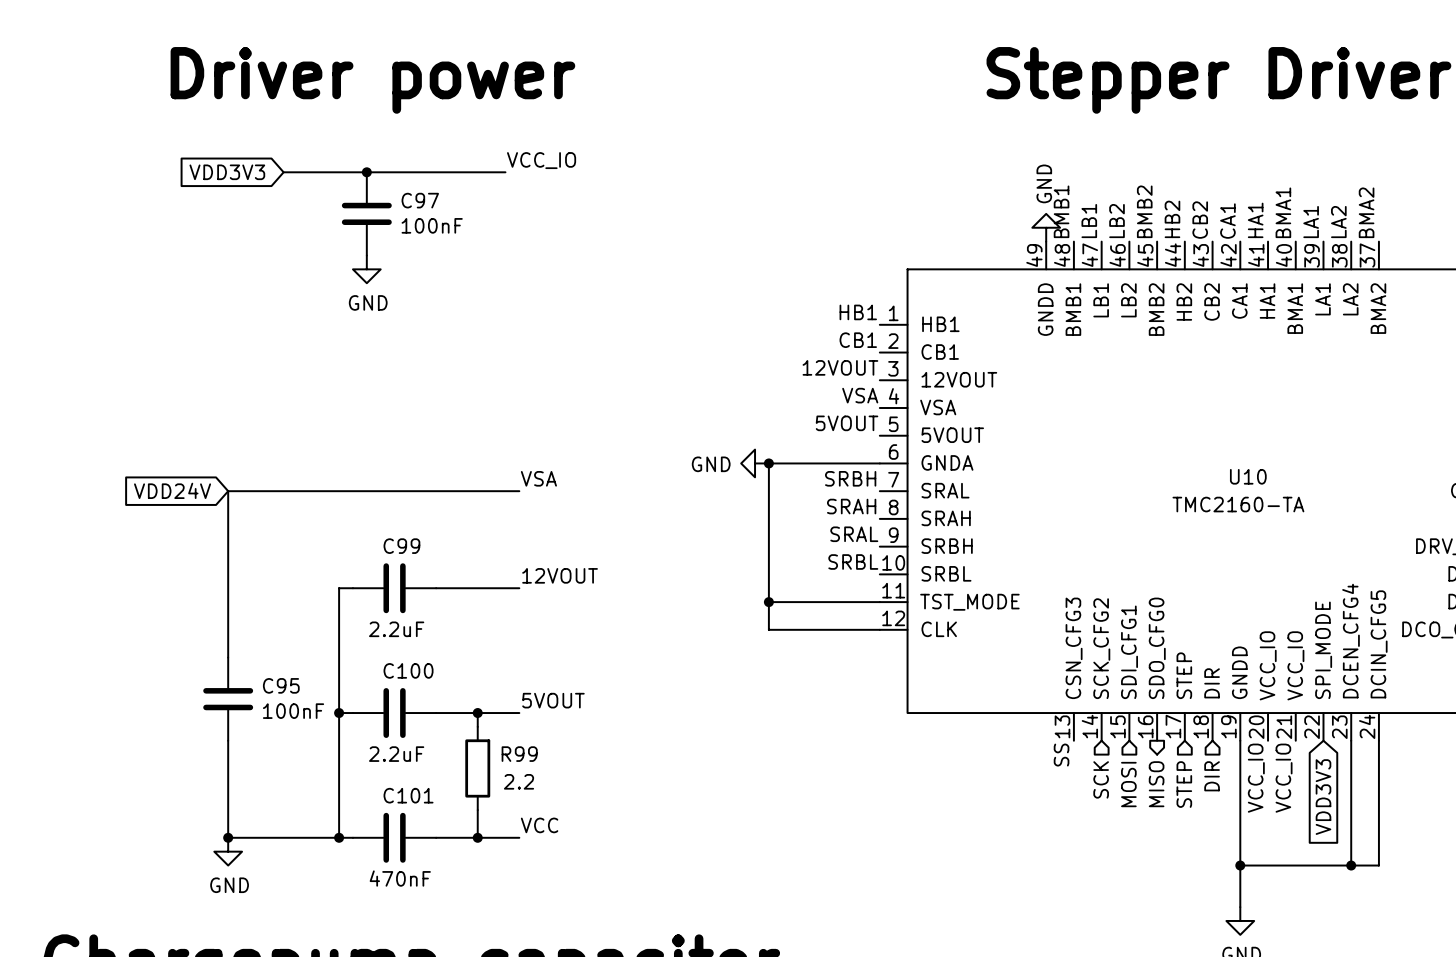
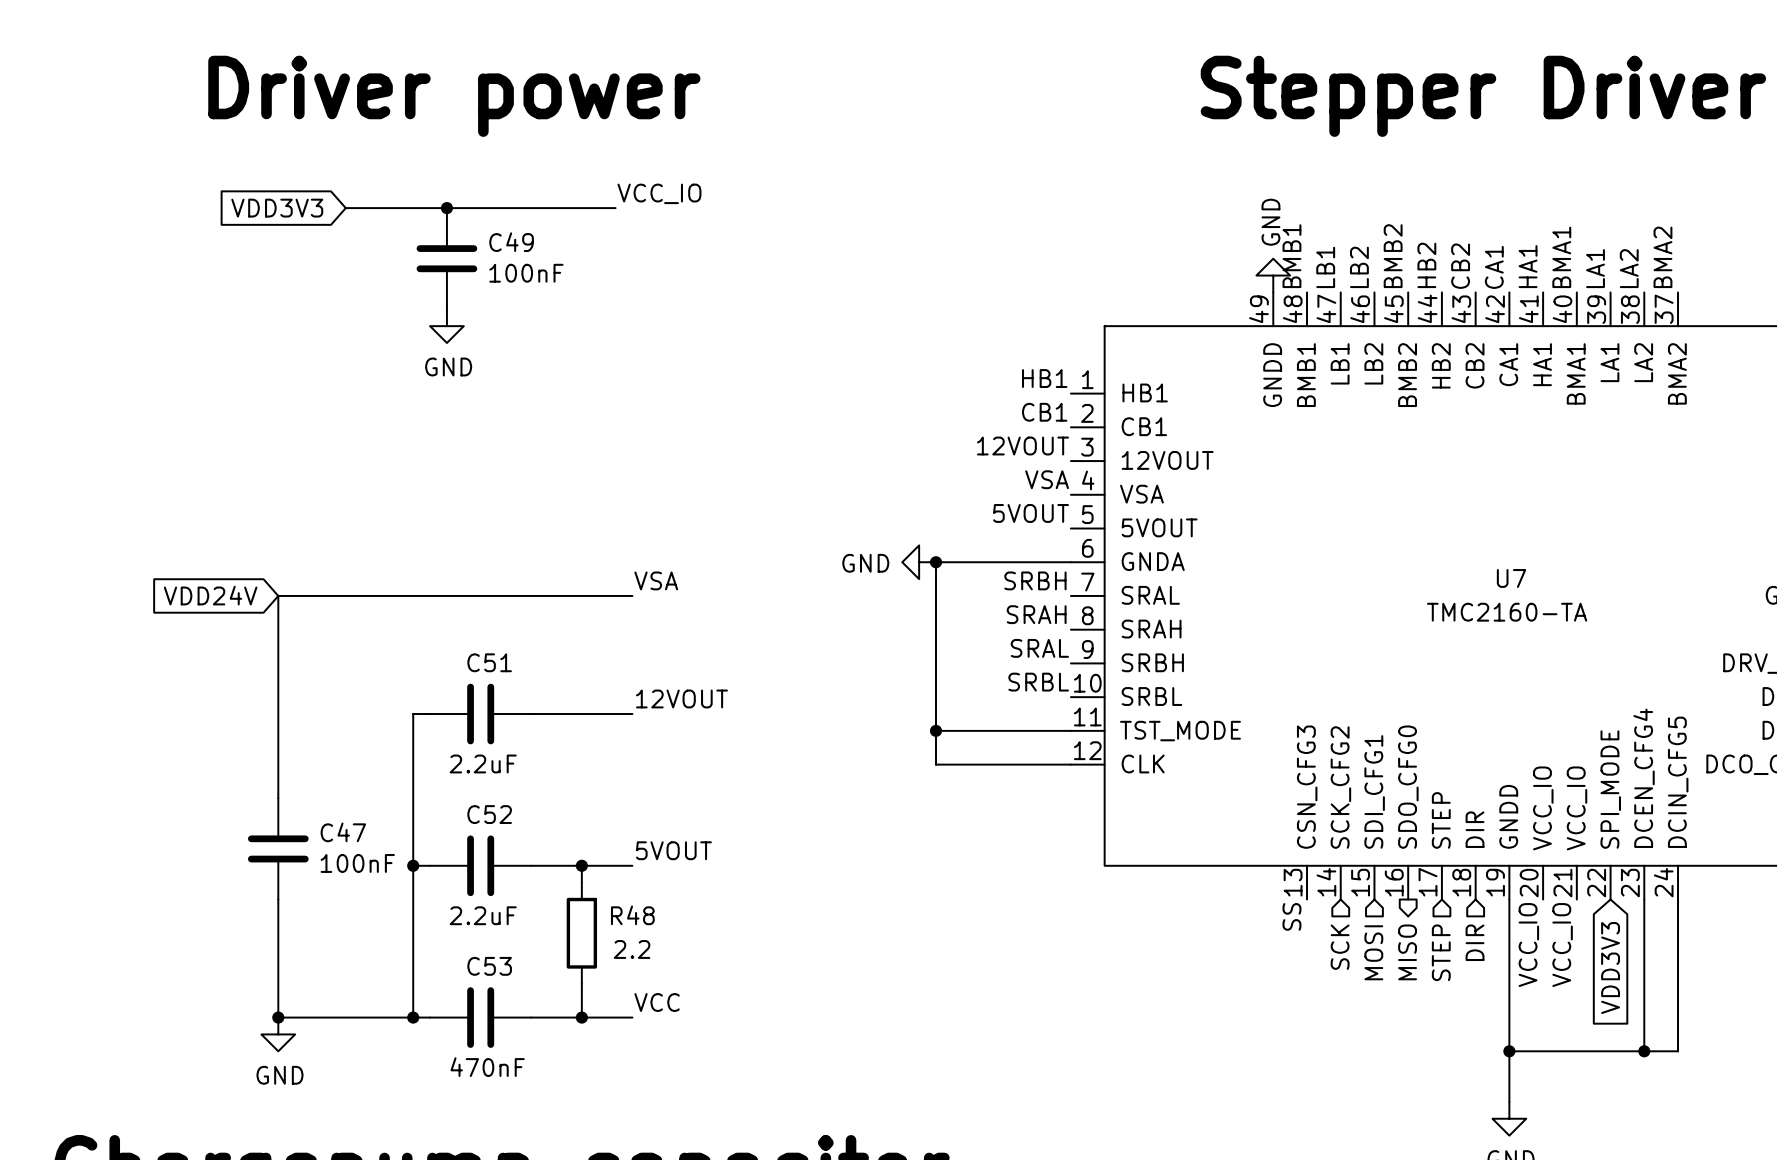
C97 name: C97 (420, 200) -> C49 (511, 242)
U10 name: U10 (1248, 476) -> U7 (1511, 578)
C99 name: C99 (401, 546) -> C51 (489, 662)
C100 name: C100 (408, 670) -> C52 (489, 814)
C95 name: C95 (281, 685) -> C47 (343, 832)
R99 name: R99 (519, 754) -> R48 (632, 915)
C101 name: C101 (408, 795) -> C53 (489, 966)

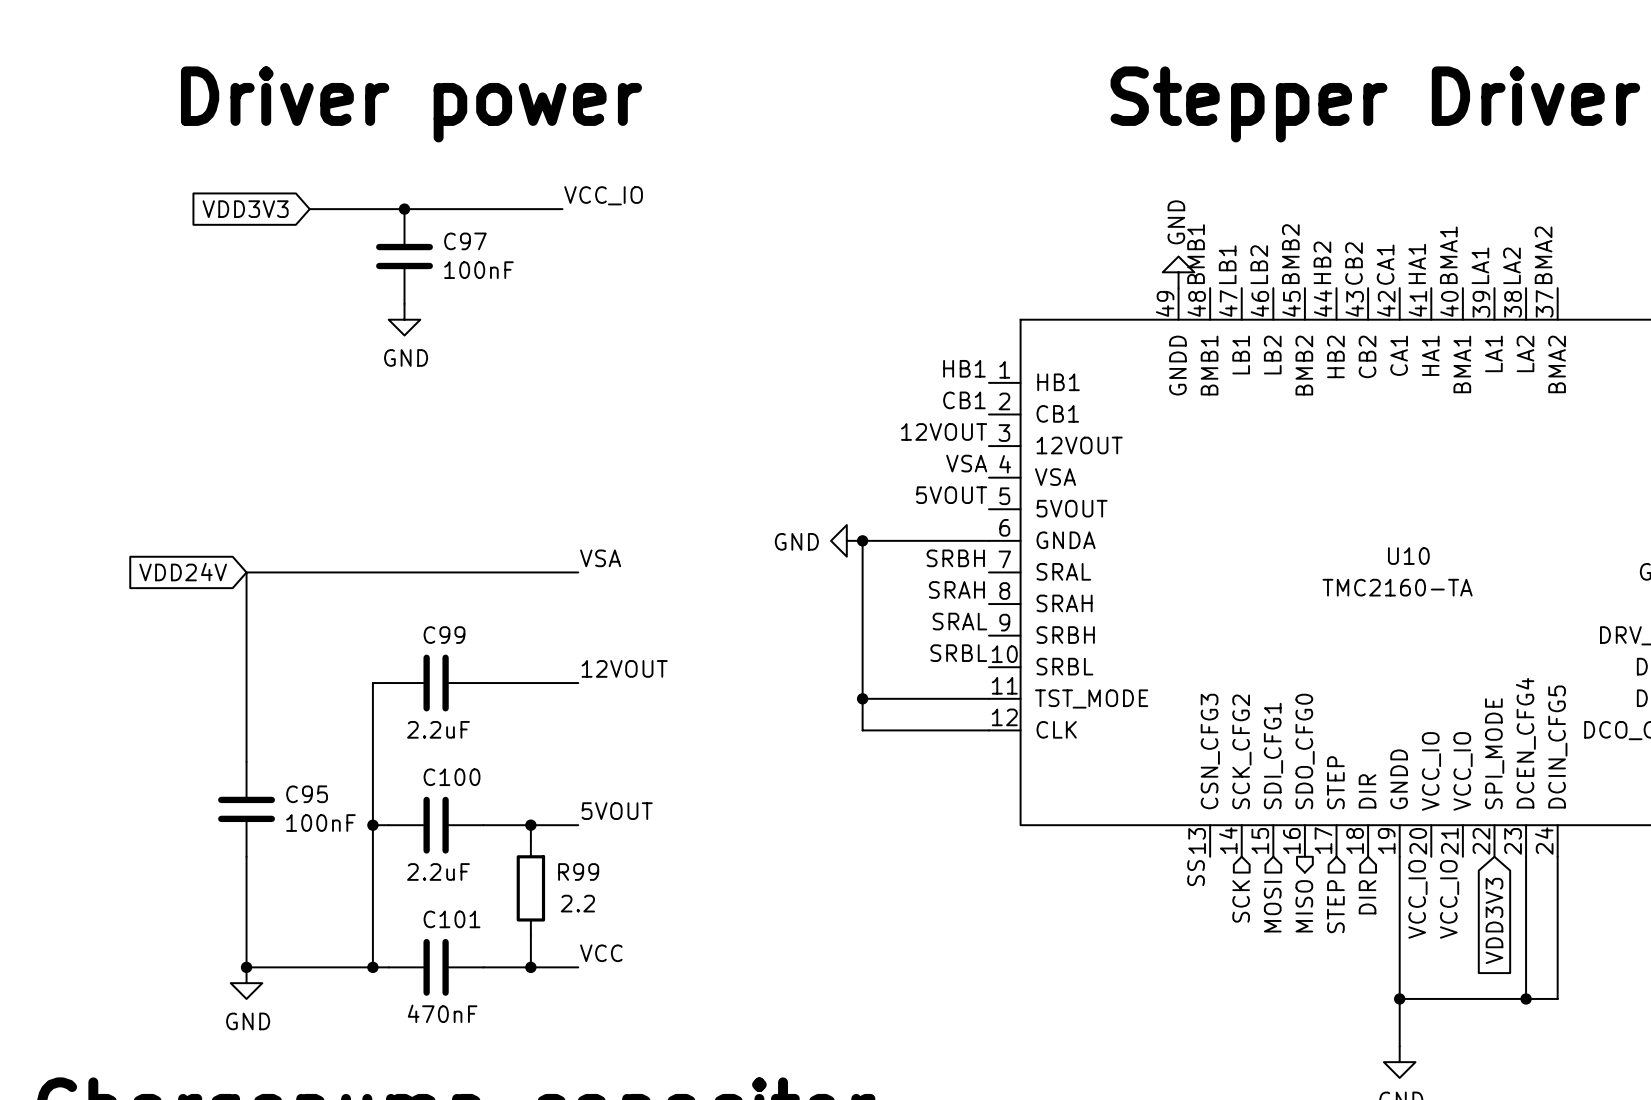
C49 name: C49 (511, 242) -> C97 (465, 241)
U7 name: U7 (1511, 578) -> U10 (1408, 556)
C51 name: C51 (489, 662) -> C99 (444, 635)
C52 name: C52 (489, 814) -> C100 (452, 777)
C47 name: C47 (343, 832) -> C95 (307, 794)
R48 name: R48 (632, 915) -> R99 (578, 871)
C53 name: C53 (489, 966) -> C101 (452, 919)

